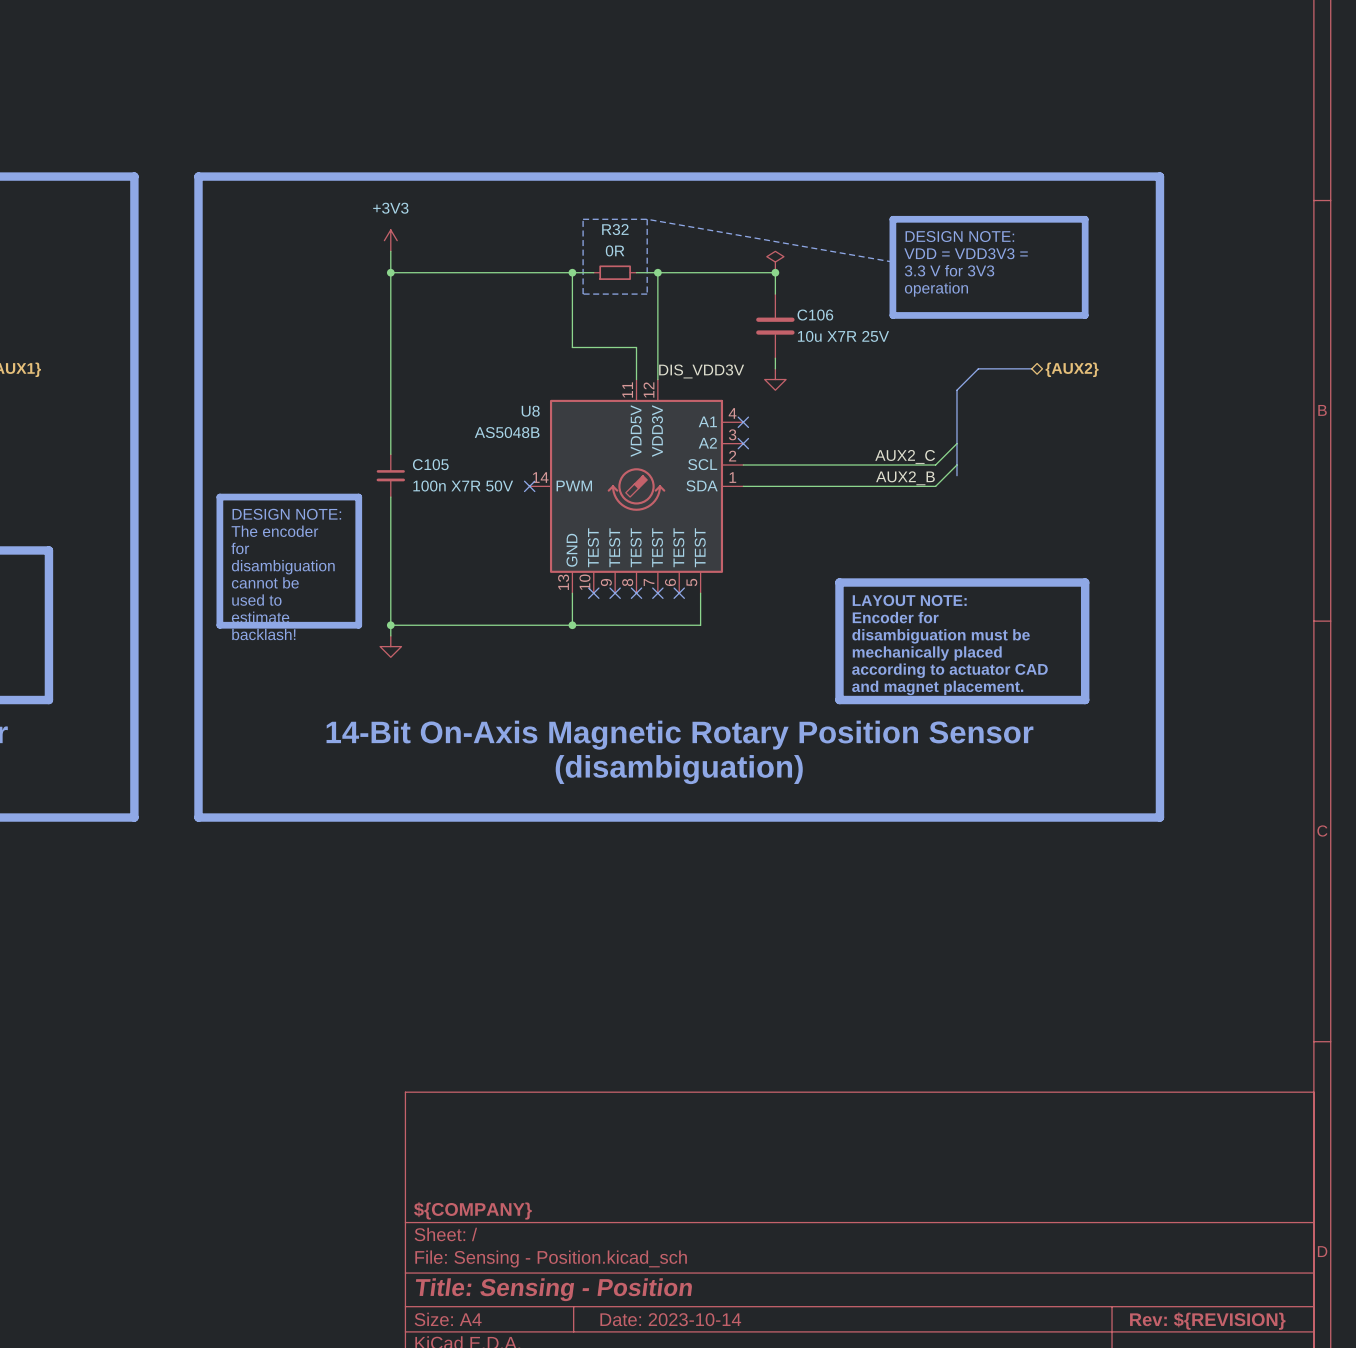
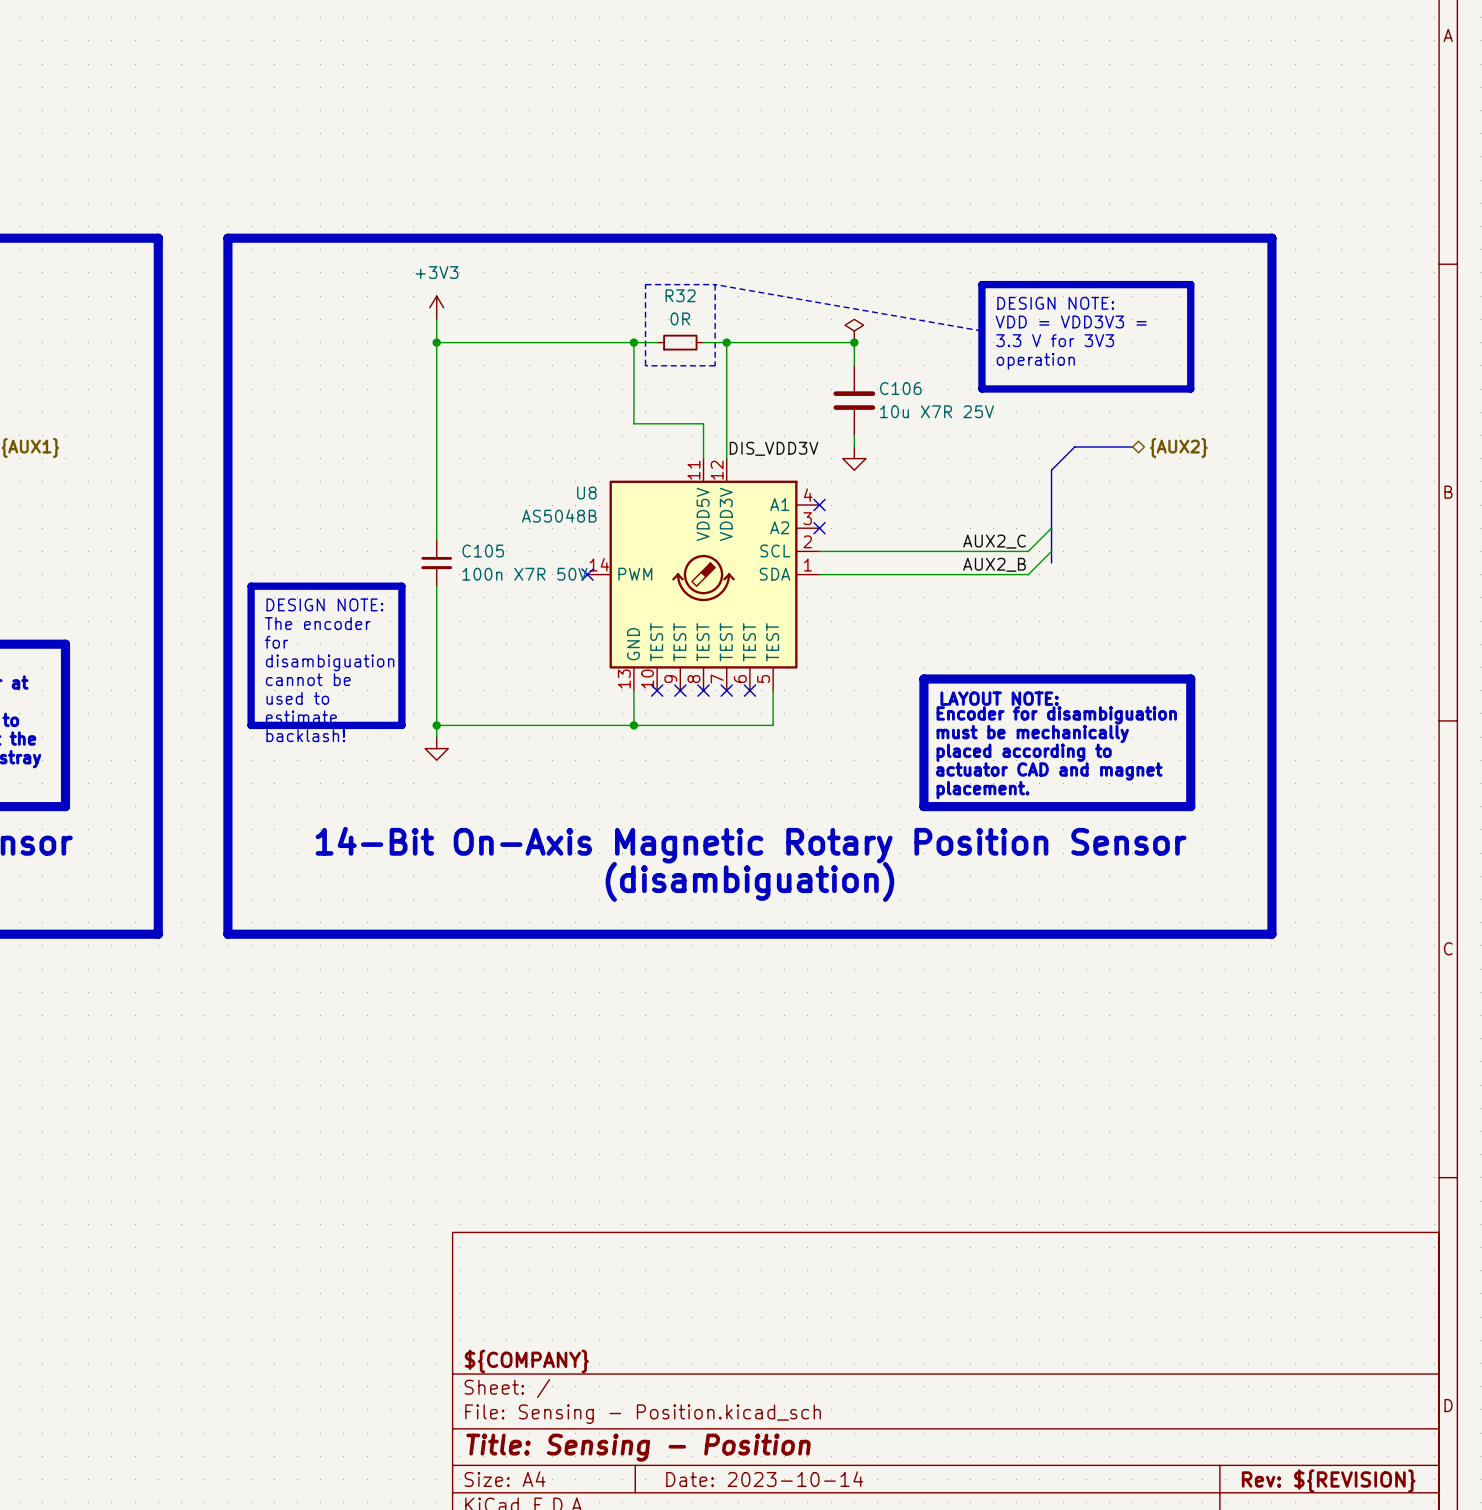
text: Encoder for (895, 617) -> Encoder for disambiguation (1056, 715)
text: disambiguation must be (941, 636) -> must be mechanically (1032, 734)
text: mechanically placed (927, 653) -> placed according to (1024, 752)
text: according to actuator CAD (949, 670) -> actuator CAD and magnet (1049, 771)
text: and magnet placement. (937, 687) -> placement. (983, 790)

